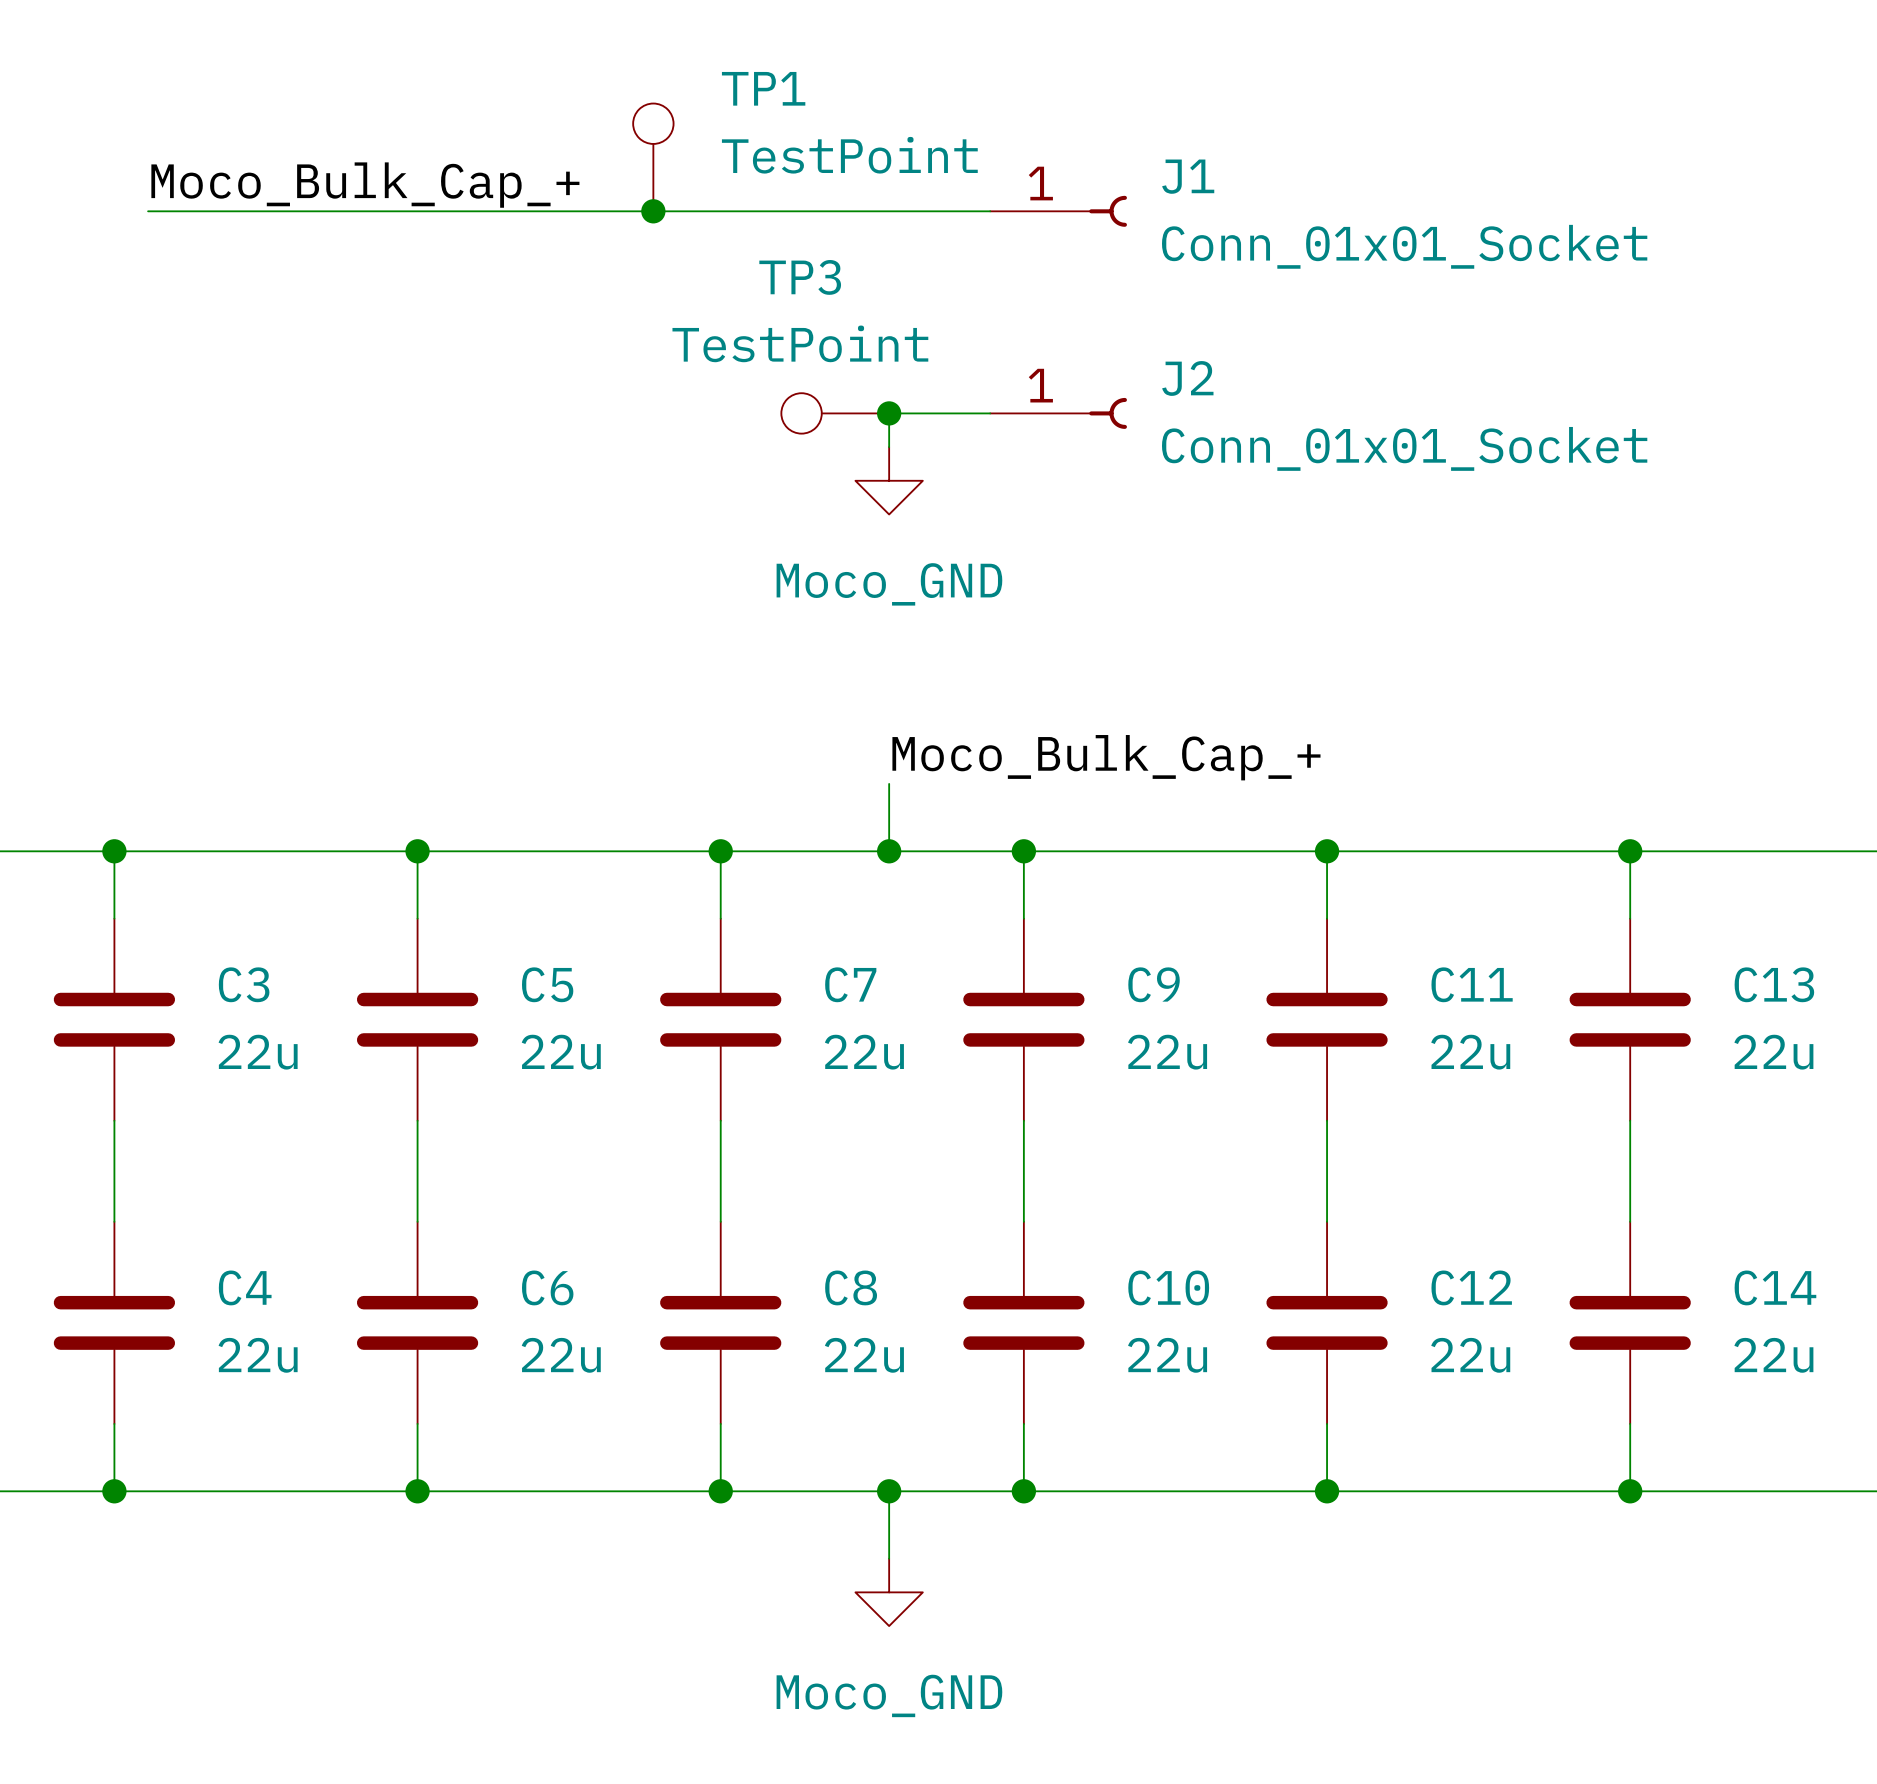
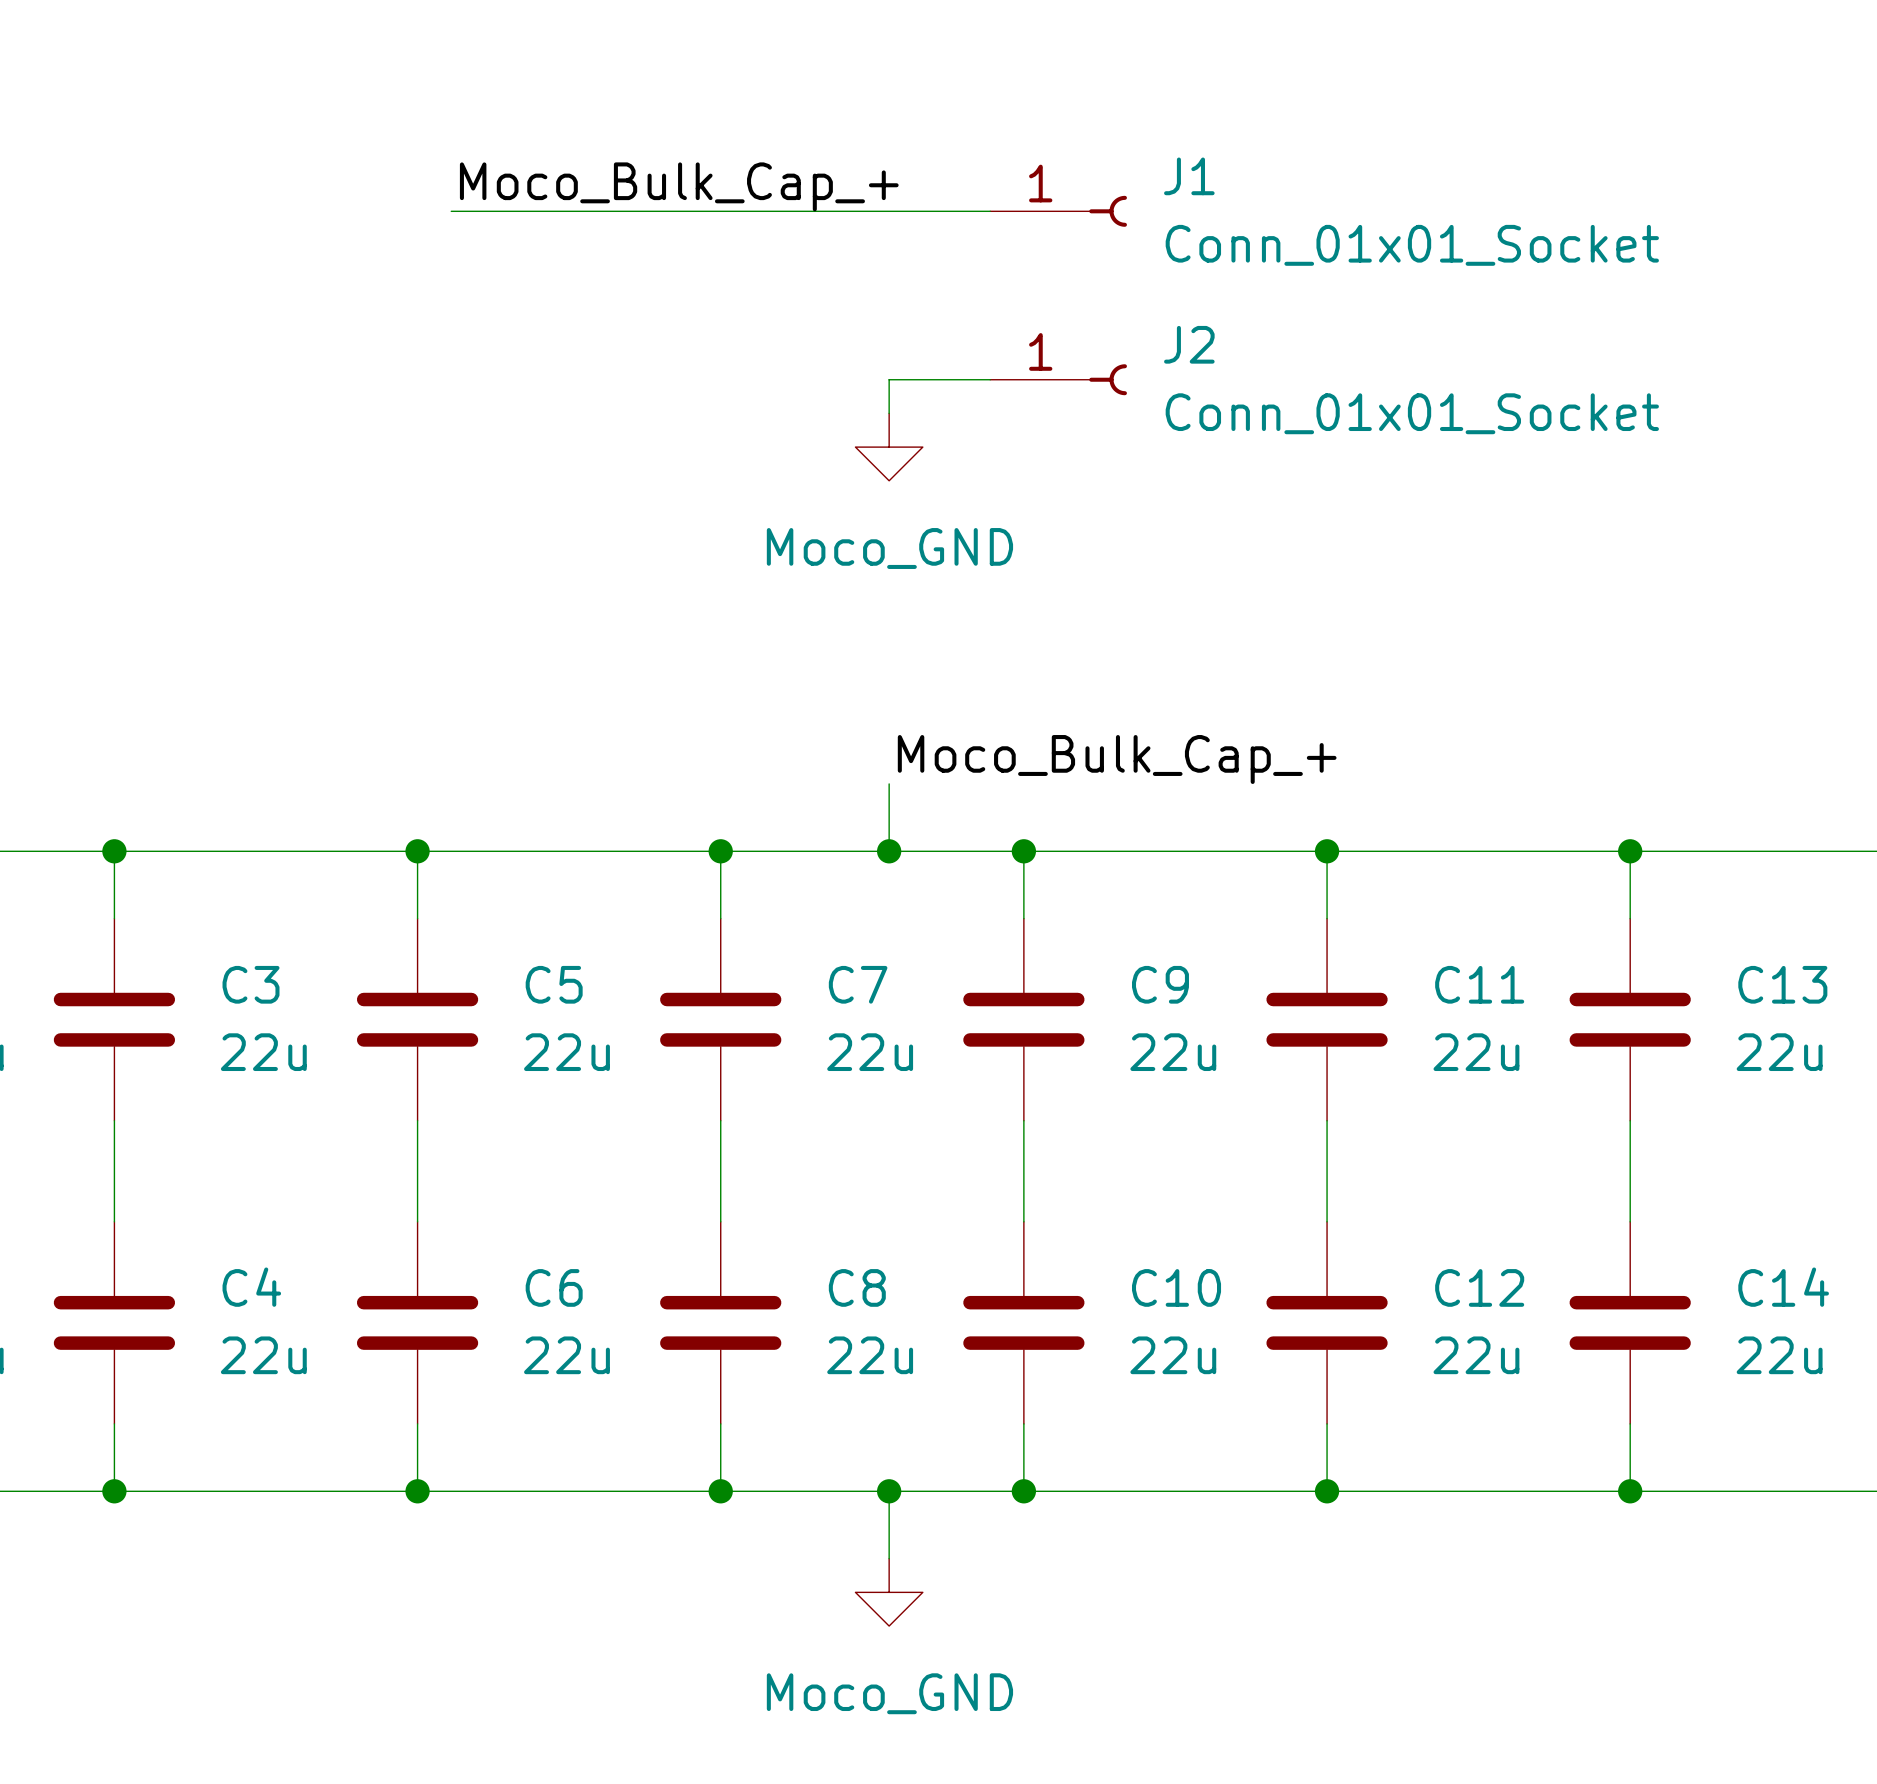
TP1: TestPoint (653, 157) -> none
label position: Moco_Bulk_Cap_+ (365, 185) -> Moco_Bulk_Cap_+ (679, 186)
wire: (148, 211) (451, 211) -> none
junction: (653, 211) -> none
TP3: TestPoint (835, 413) -> none
junction: (889, 413) -> none
wire: (990, 413) (889, 413) (889, 447) -> (990, 379) (889, 379) (889, 413)
J2 position: (1058, 413) -> (1058, 379)
power symbol position: Moco_GND (889, 480) -> Moco_GND (889, 447)

